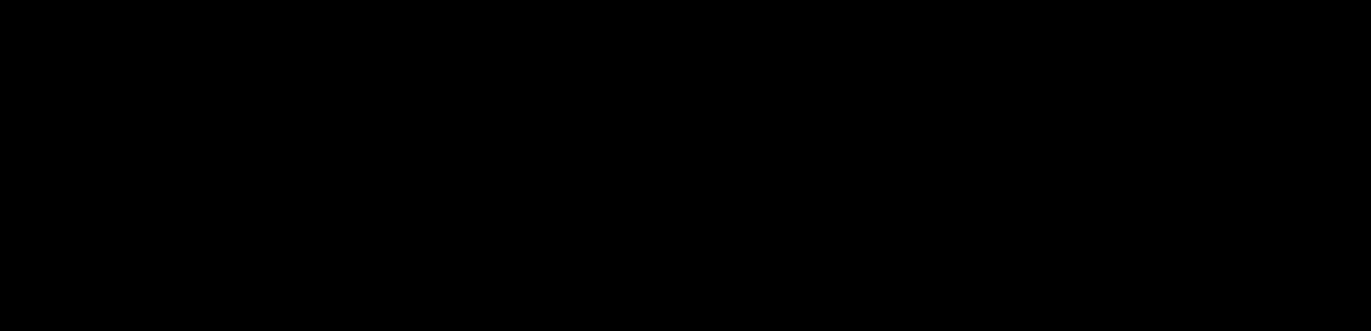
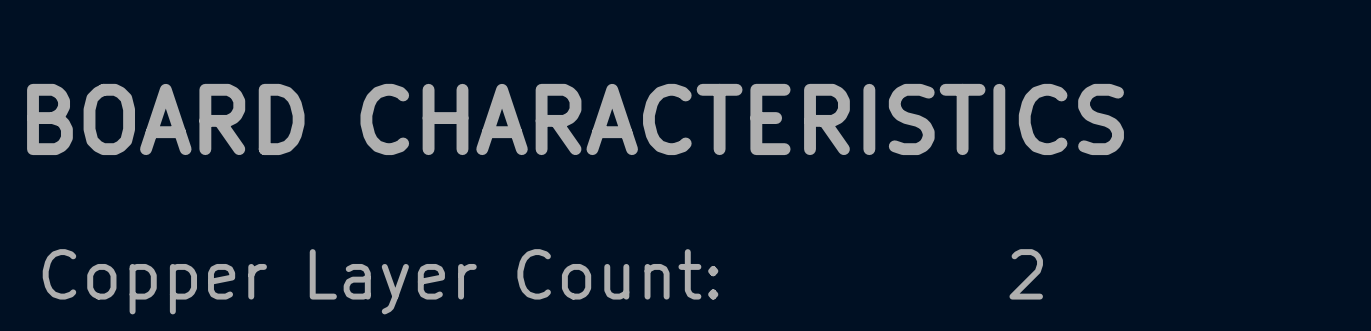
text: none -> BOARD CHARACTERISTICS (575, 119)
text: none -> 2 (1026, 274)
text: none -> Copper Layer Count: (380, 281)

